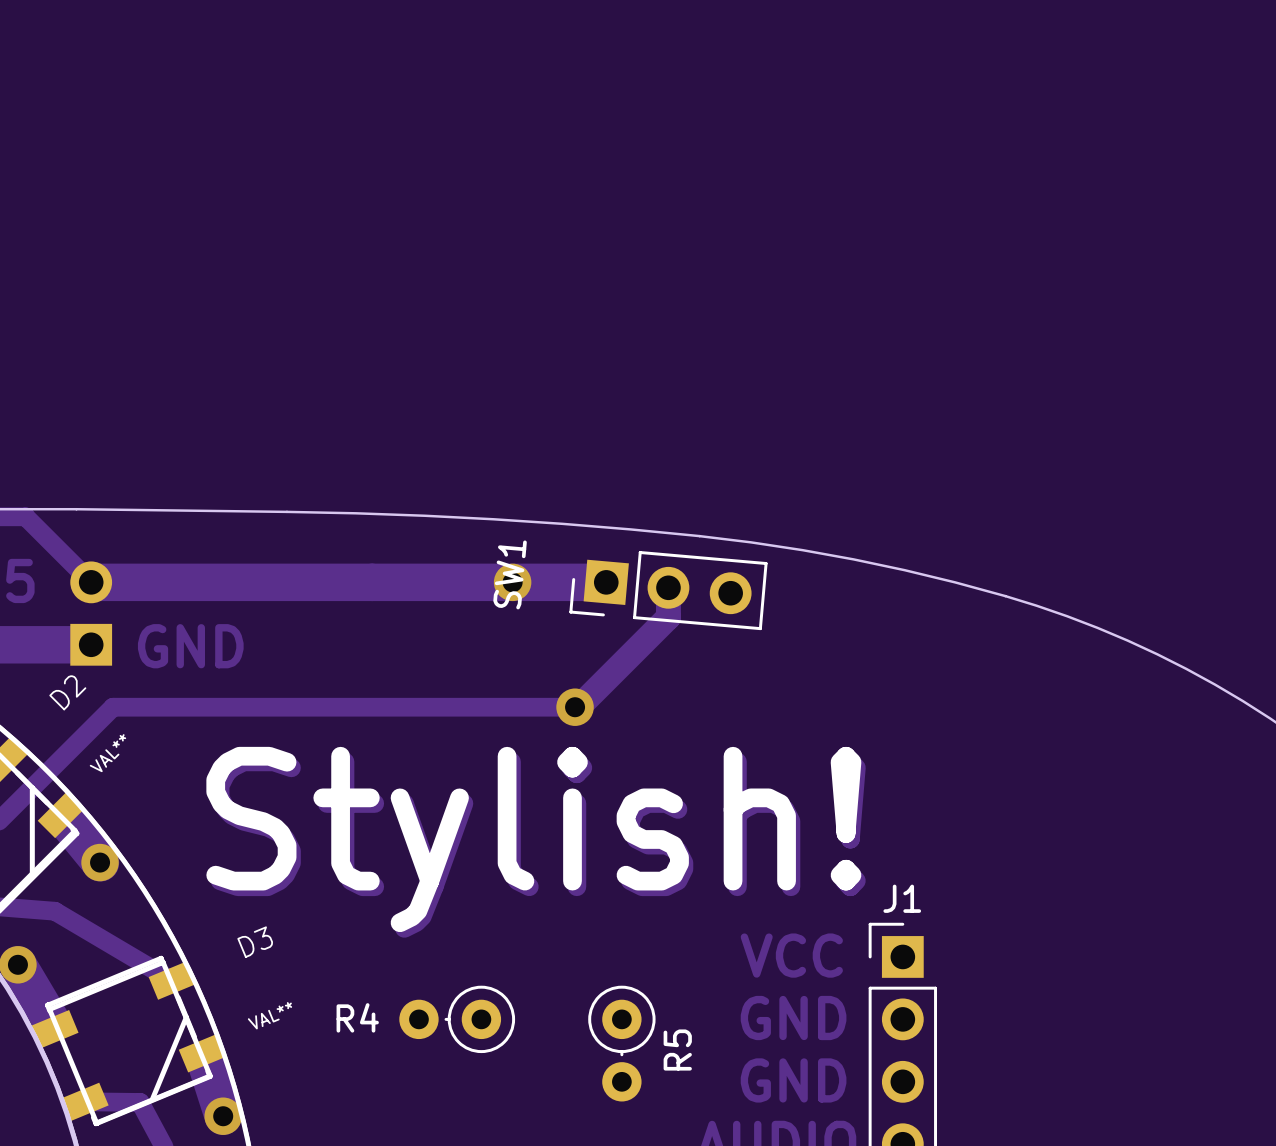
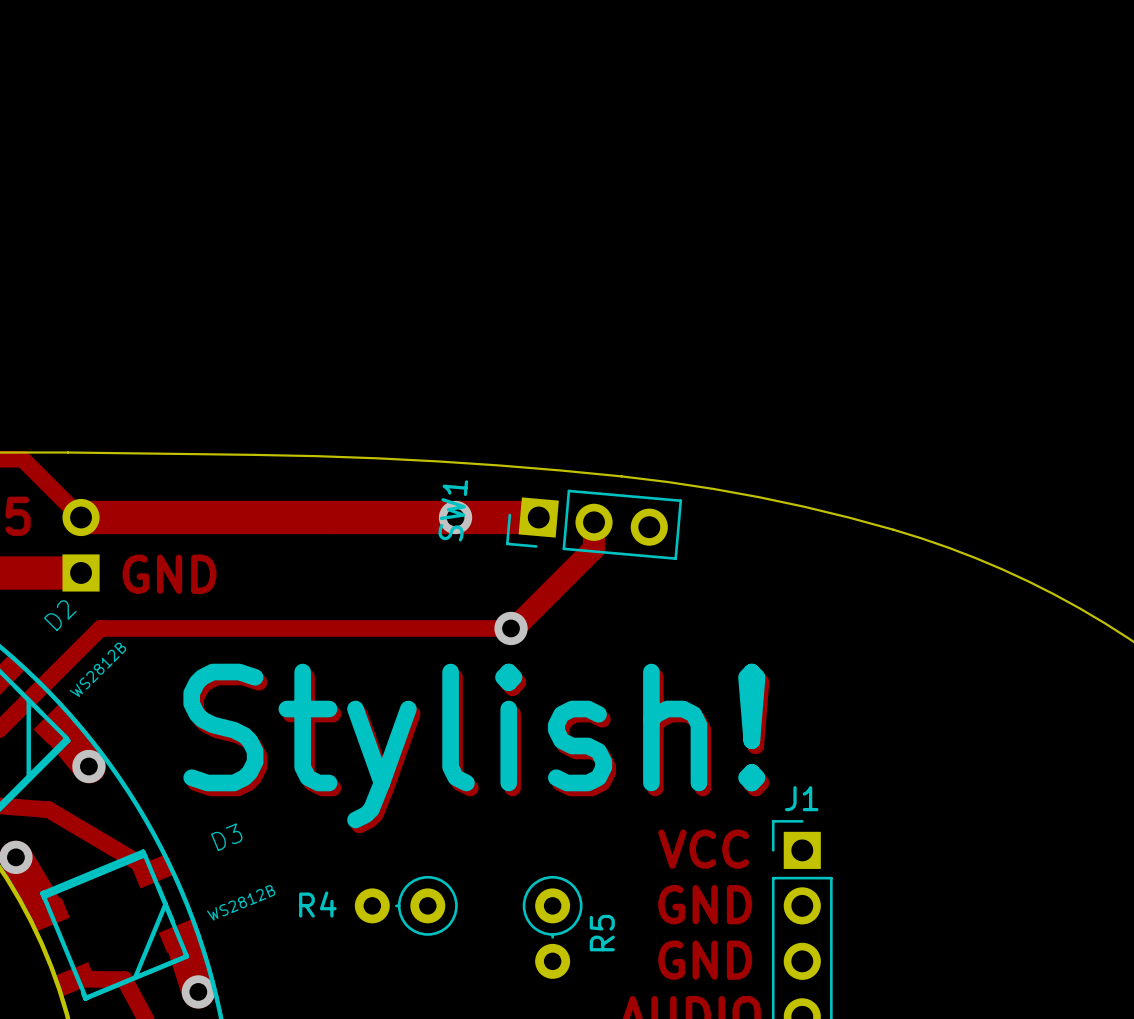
D2 value: VAL** (107, 753) -> WS2812B (97, 669)
D3 value: VAL** (270, 1015) -> WS2812B (241, 902)

